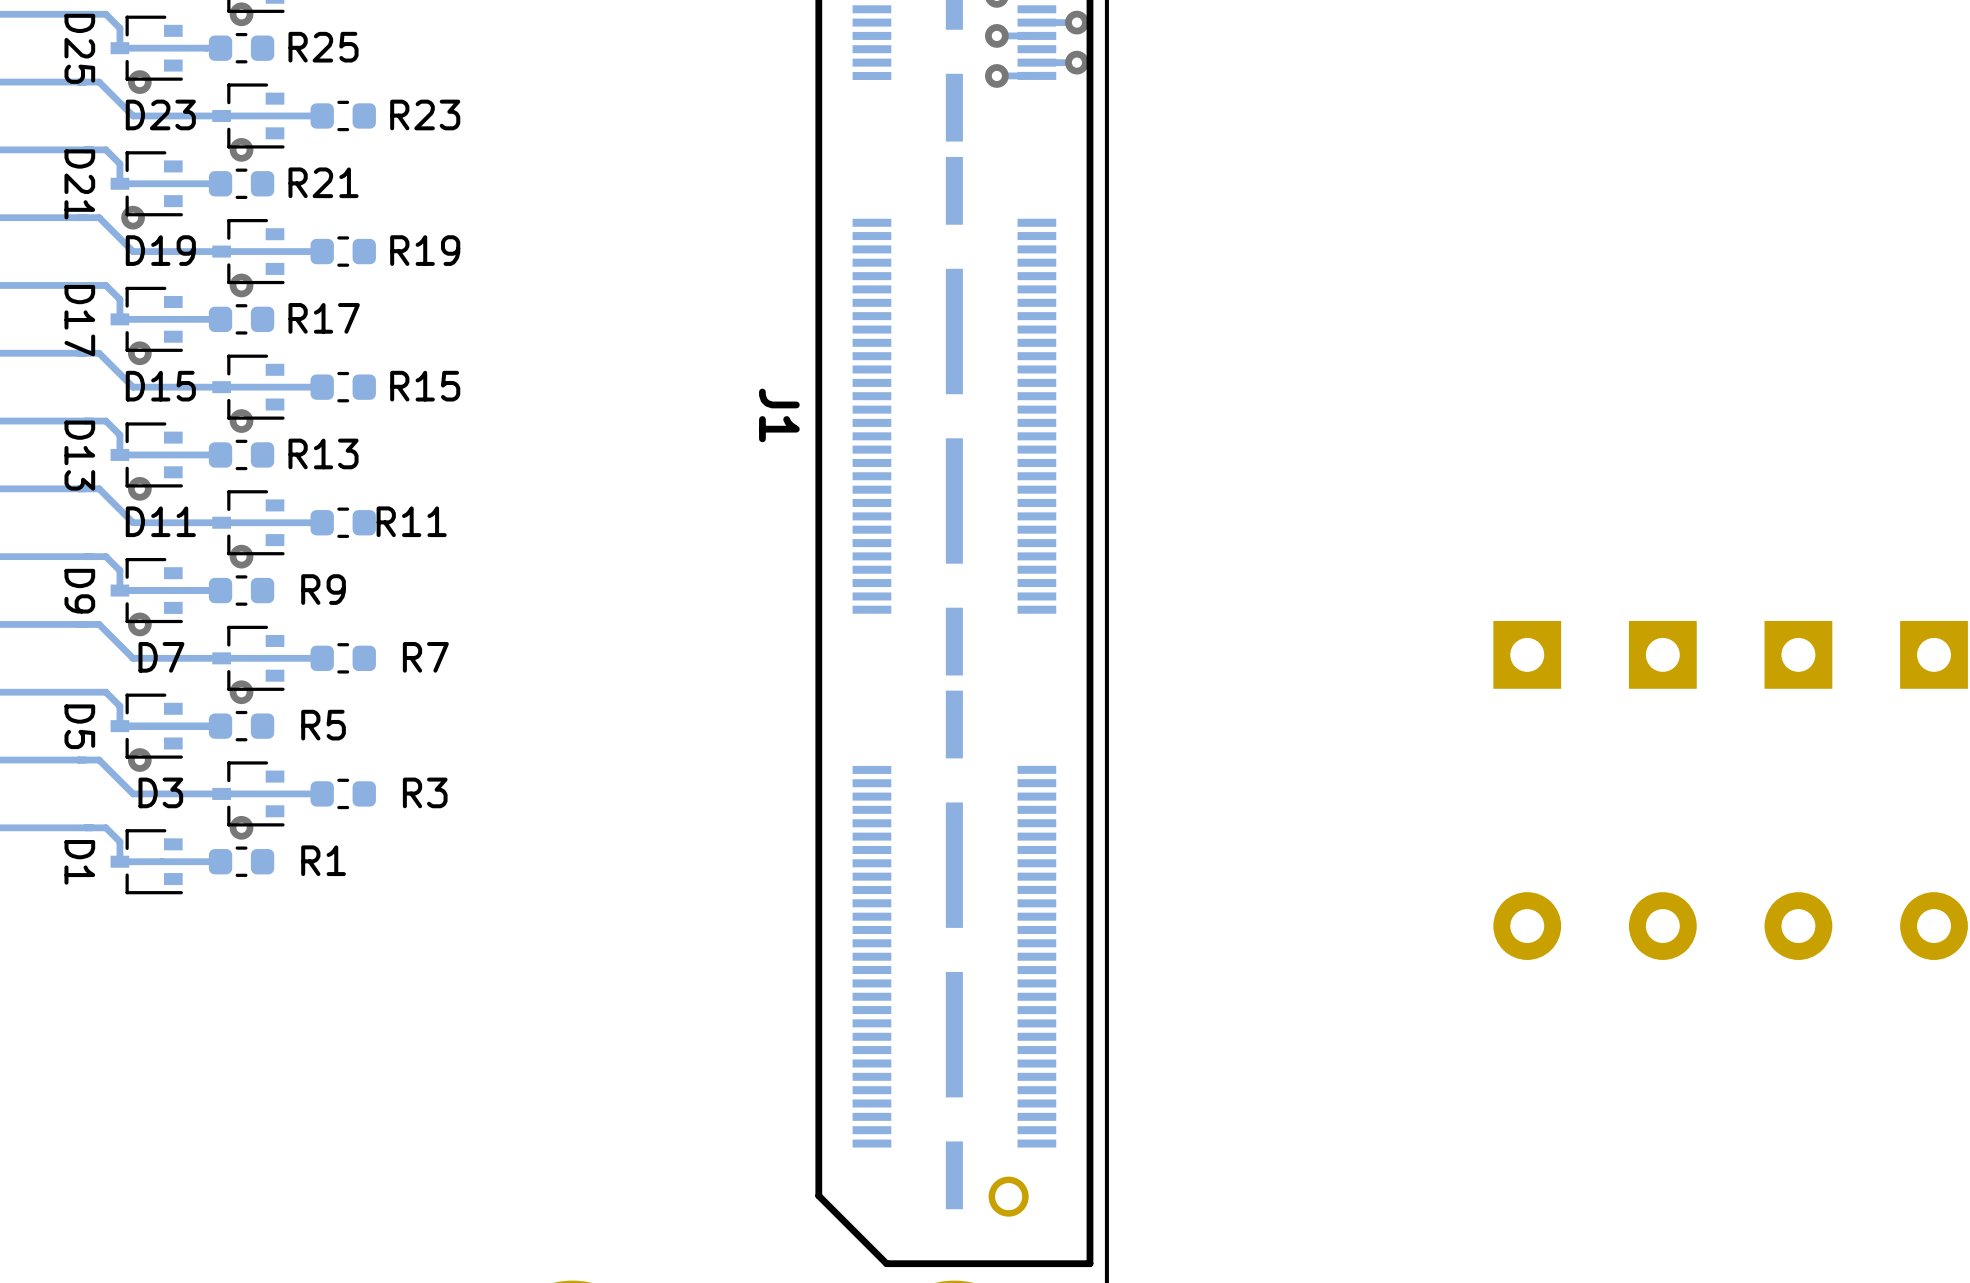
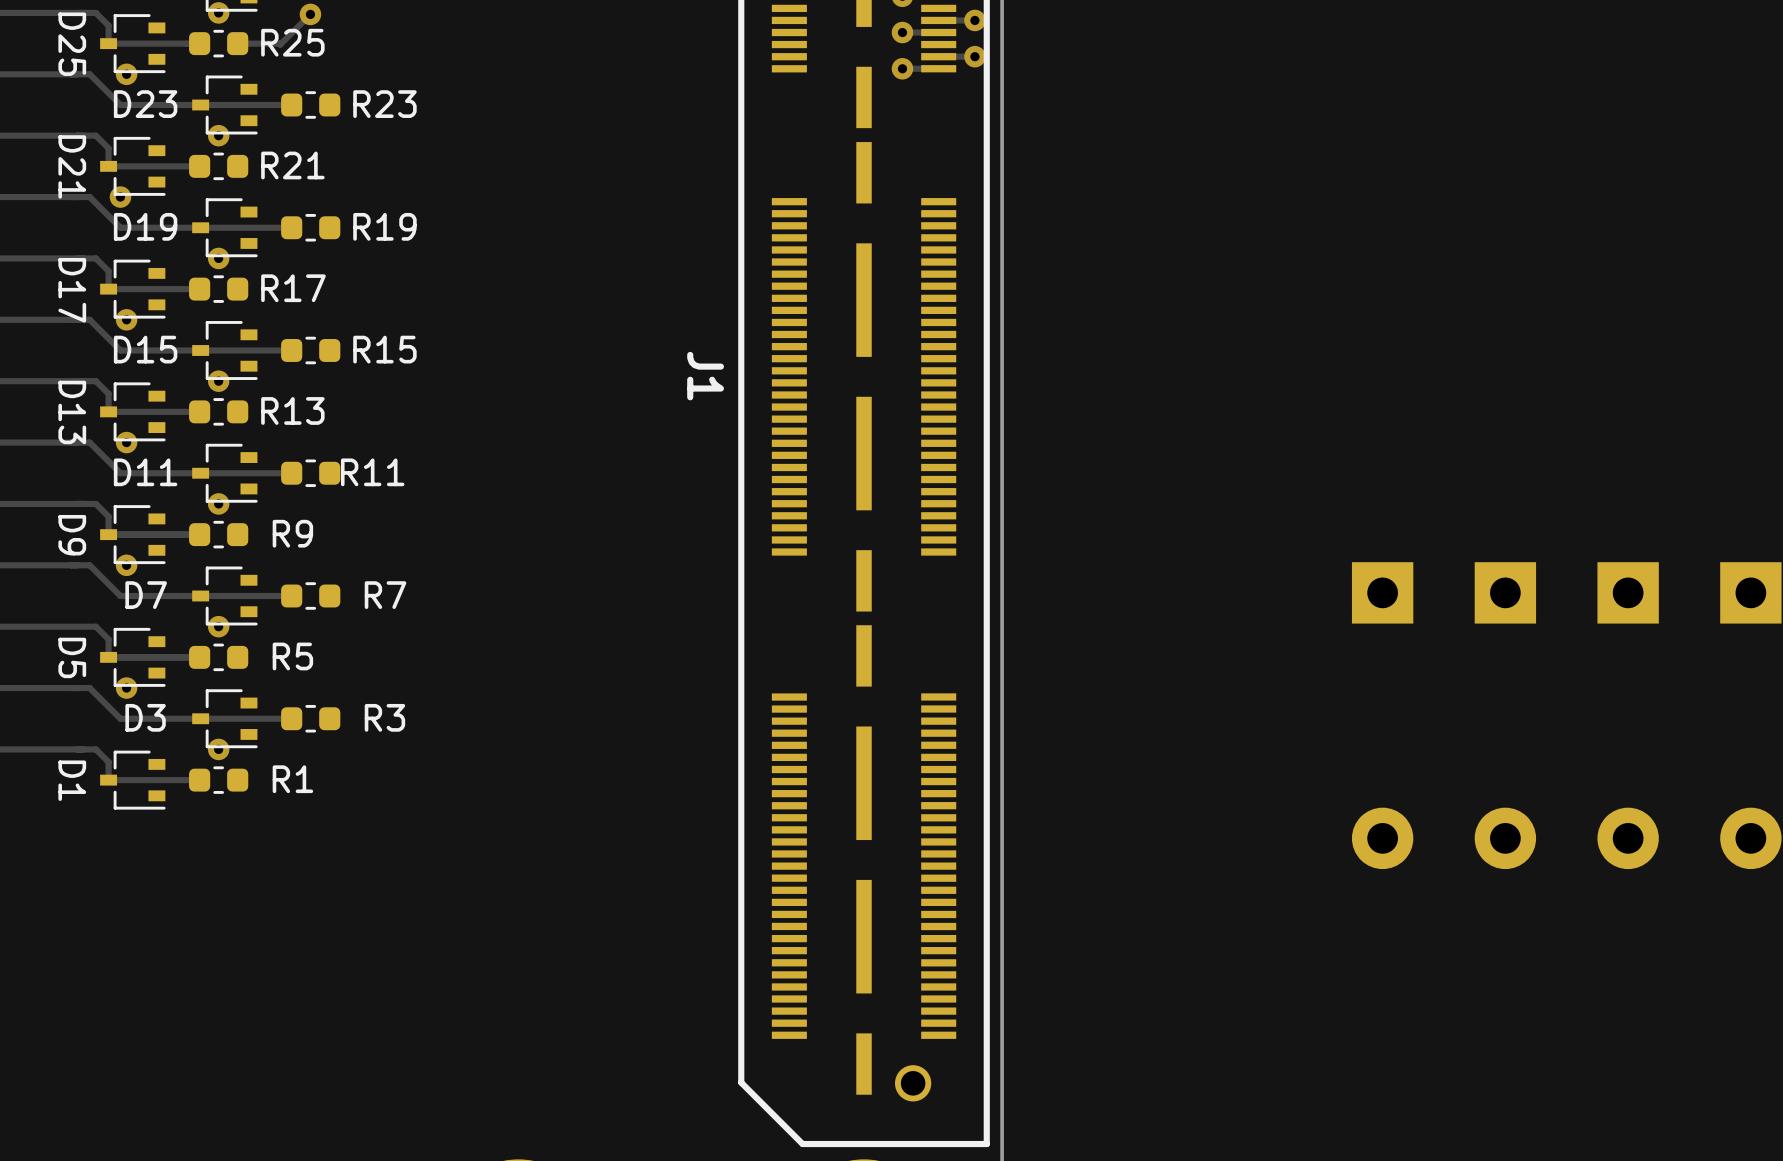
track: none -> (310, 14) (280, 44) (237, 43)
via: none -> (310, 14)

